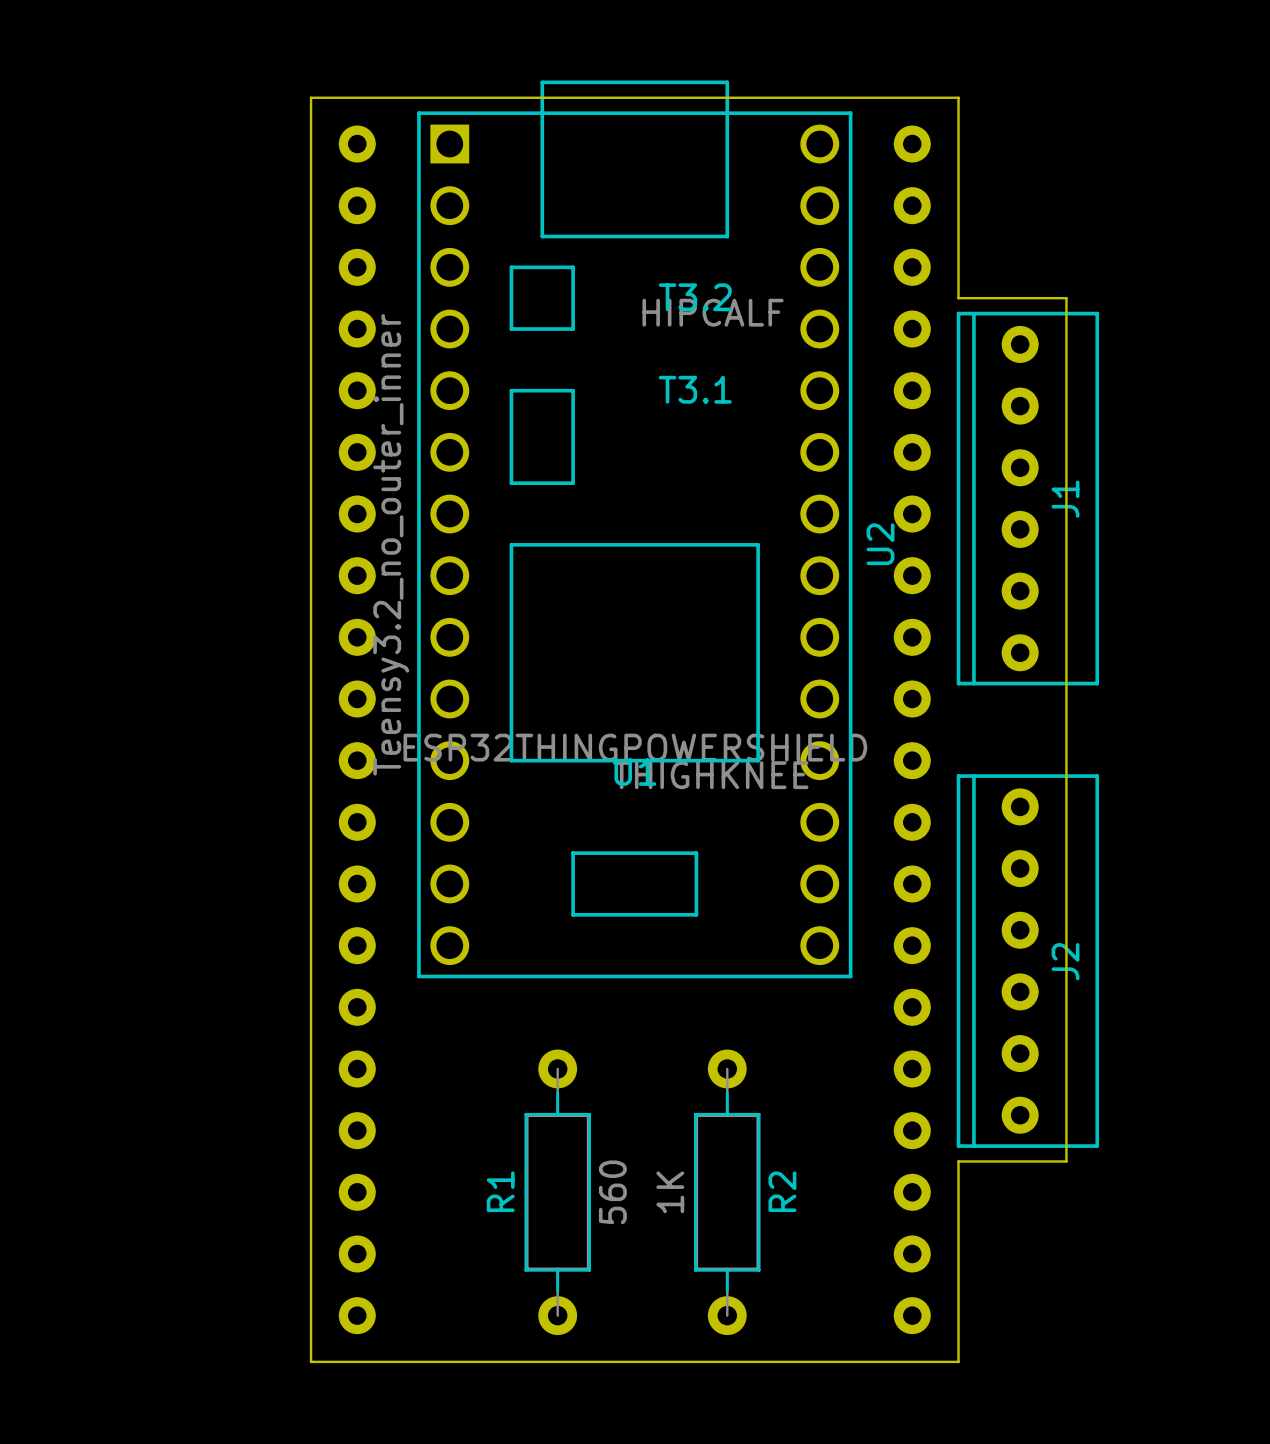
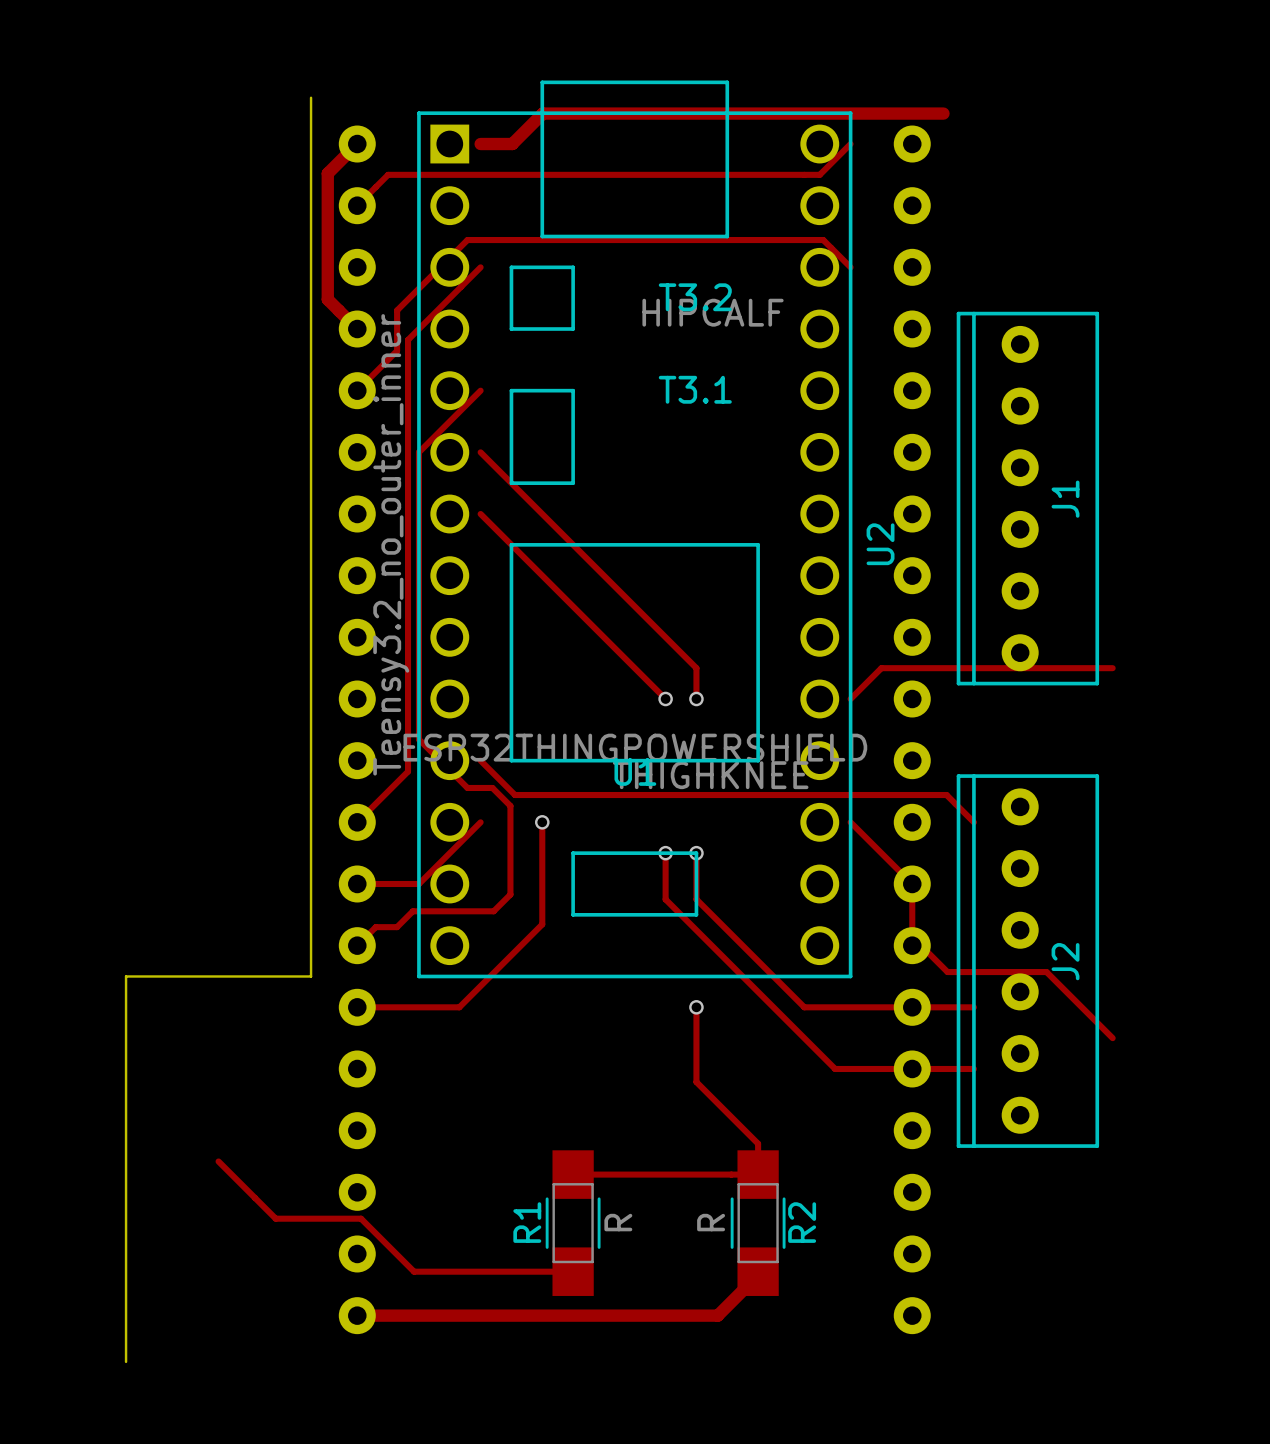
board edge: (311, 97) (958, 97) (958, 298) (1066, 298) (1066, 1161) (958, 1161) (958, 1361) (311, 1361) (311, 976) -> (126, 1361) (126, 976) (311, 976)
track: none -> (943, 113) (542, 113) (512, 144) (480, 144)
track: none -> (357, 144) (327, 173) (327, 299) (357, 329)
track: none -> (850, 144) (819, 174) (388, 174) (357, 205)
track: none -> (480, 267) (408, 339) (408, 771) (357, 822)
track: none -> (850, 267) (823, 240) (467, 240) (397, 310) (397, 350) (357, 390)
track: none -> (480, 390) (418, 452) (418, 739) (467, 787) (492, 787) (510, 805) (510, 894) (493, 911) (412, 911) (397, 927) (375, 927) (357, 945)
track: none -> (480, 452) (696, 668) (696, 698)
track: none -> (480, 514) (665, 698)
track: none -> (1112, 668) (881, 668) (850, 698)
via: none -> (665, 698)
via: none -> (696, 698)
track: none -> (480, 760) (514, 795) (946, 795) (973, 822)
track: none -> (480, 822) (418, 883) (357, 883)
track: none -> (542, 822) (542, 924) (459, 1007) (357, 1007)
via: none -> (542, 822)
track: none -> (850, 822) (912, 883) (912, 936) (947, 972) (1046, 972) (1112, 1038)
track: none -> (665, 853) (665, 899) (835, 1068) (973, 1068)
via: none -> (665, 853)
track: none -> (696, 853) (696, 899) (804, 1007) (973, 1007)
via: none -> (696, 853)
track: none -> (696, 1007) (696, 1082) (758, 1143) (758, 1174) (573, 1174)
via: none -> (696, 1007)
R1 footprint: [524, 1049, 591, 1336] -> [545, 1150, 601, 1296]
R2 footprint: [694, 1049, 761, 1336] -> [730, 1150, 786, 1296]
track: none -> (218, 1161) (275, 1218) (361, 1218) (414, 1271) (573, 1271)
R1 value: 560 (612, 1192) -> R (618, 1222)
R2 value: 1K (670, 1192) -> R (711, 1222)
track: none -> (758, 1271) (758, 1275) (717, 1315) (357, 1315)

